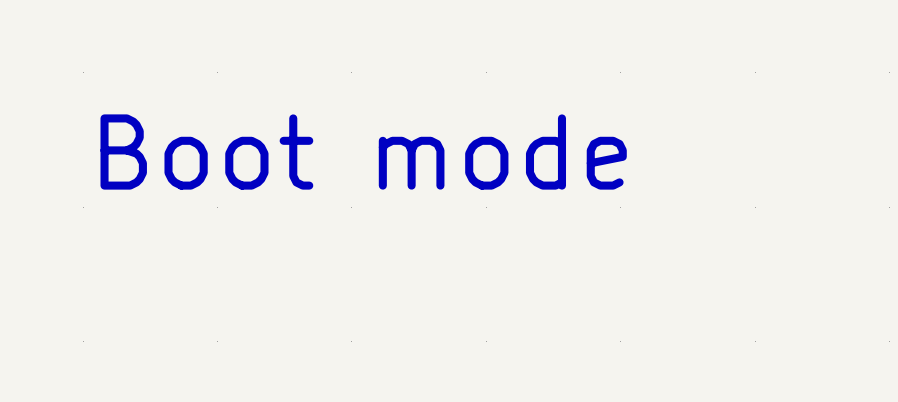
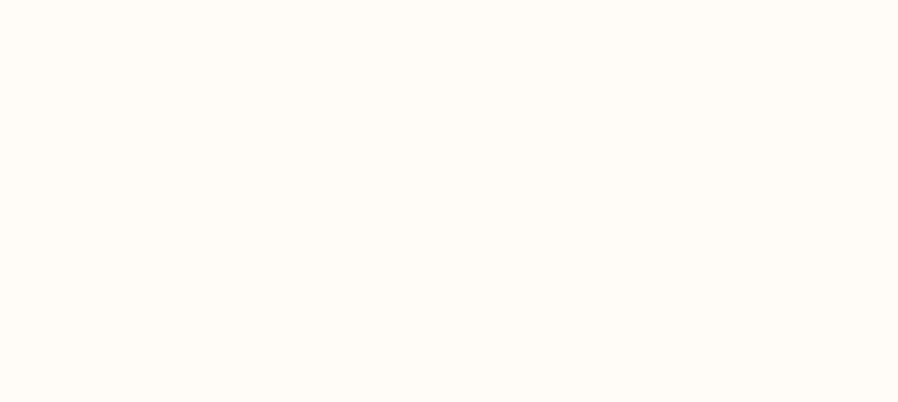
text: Boot mode (363, 152) -> none

